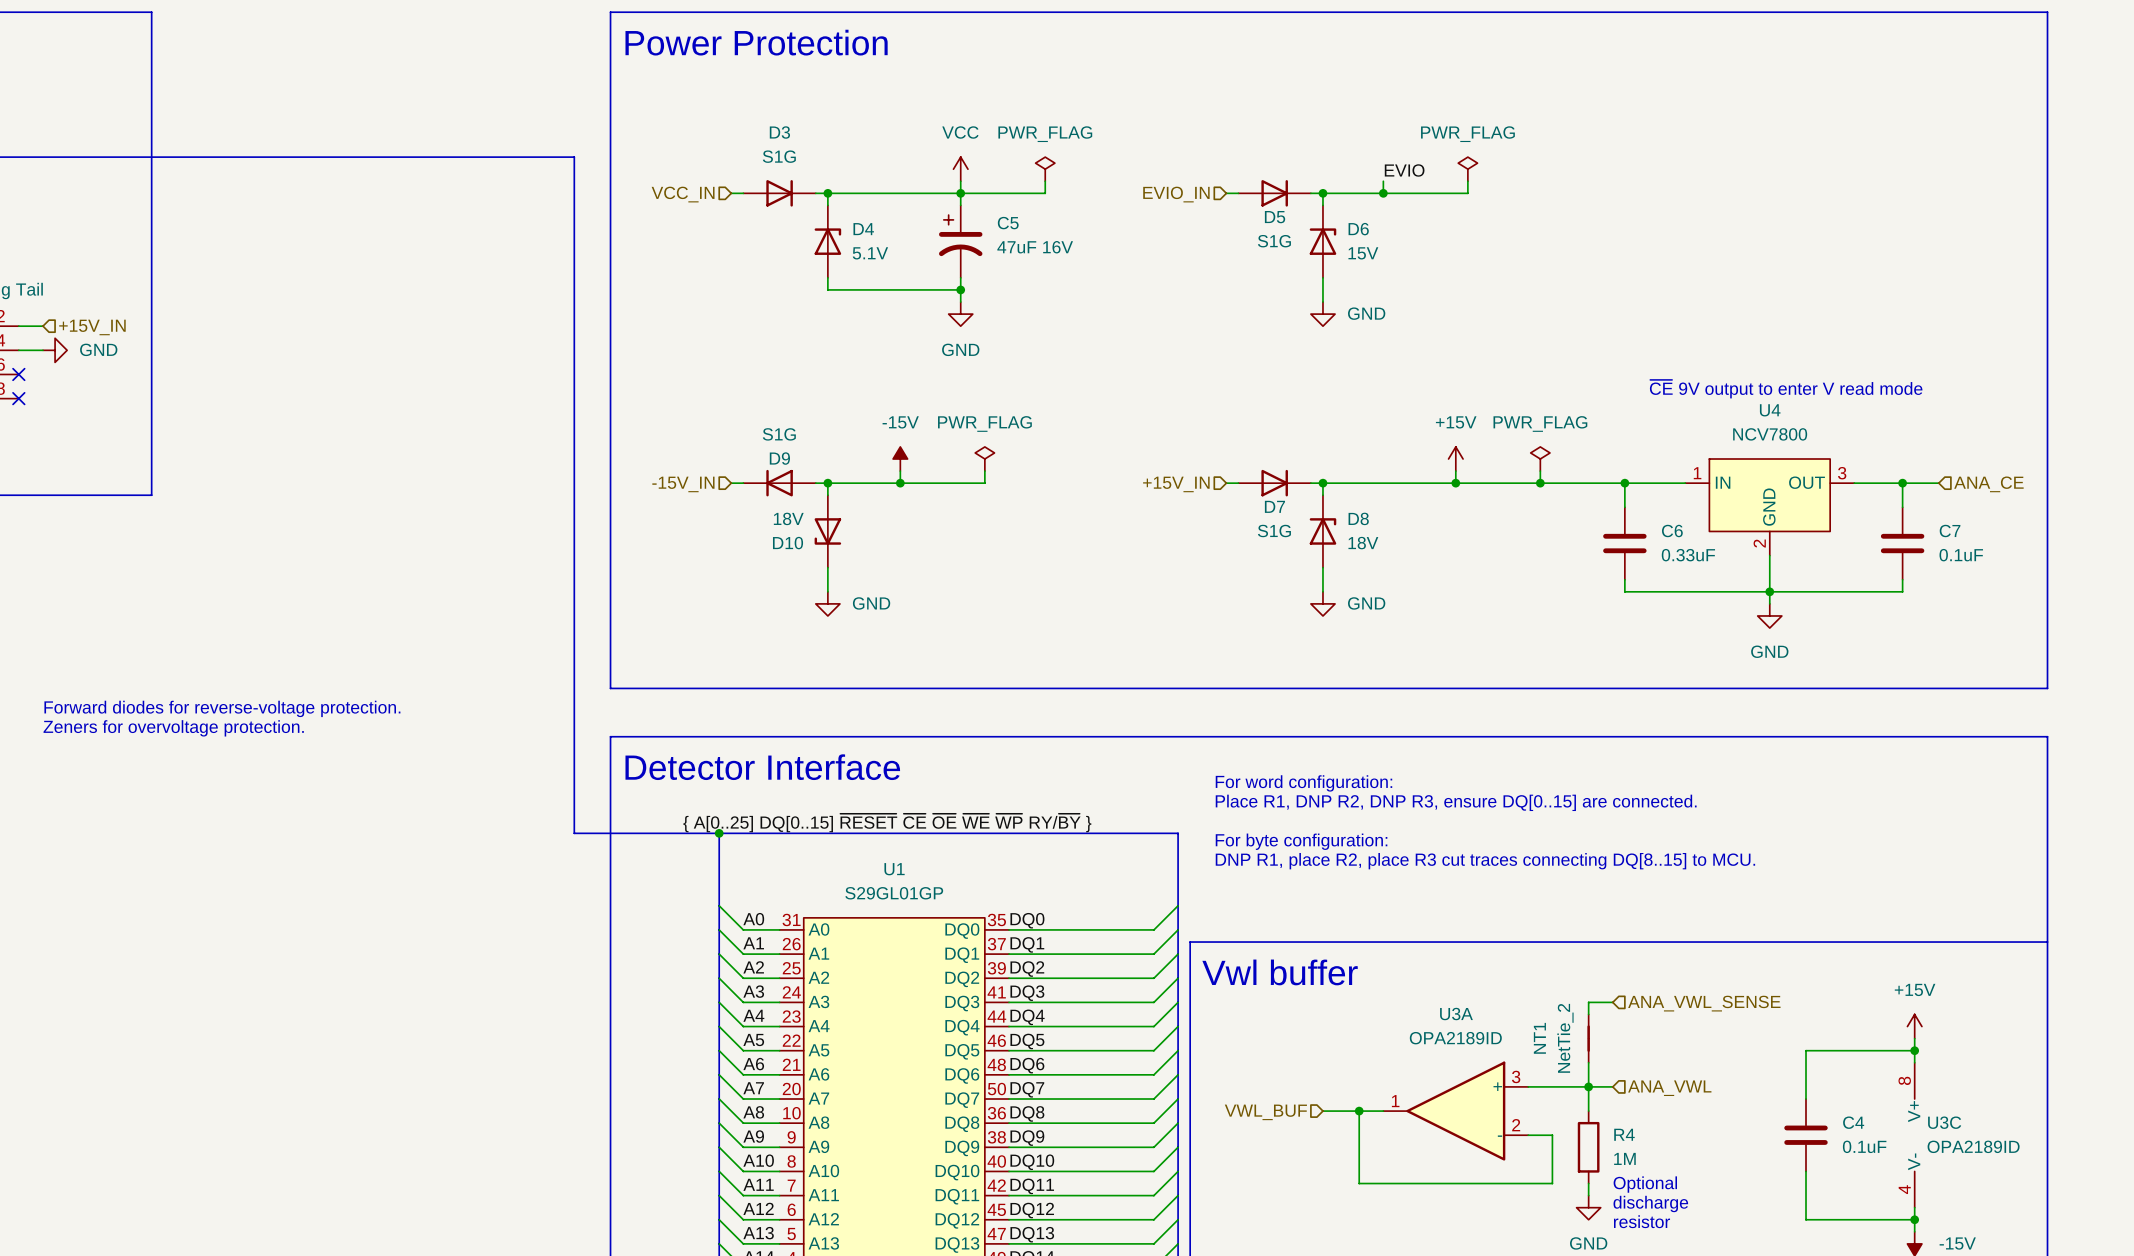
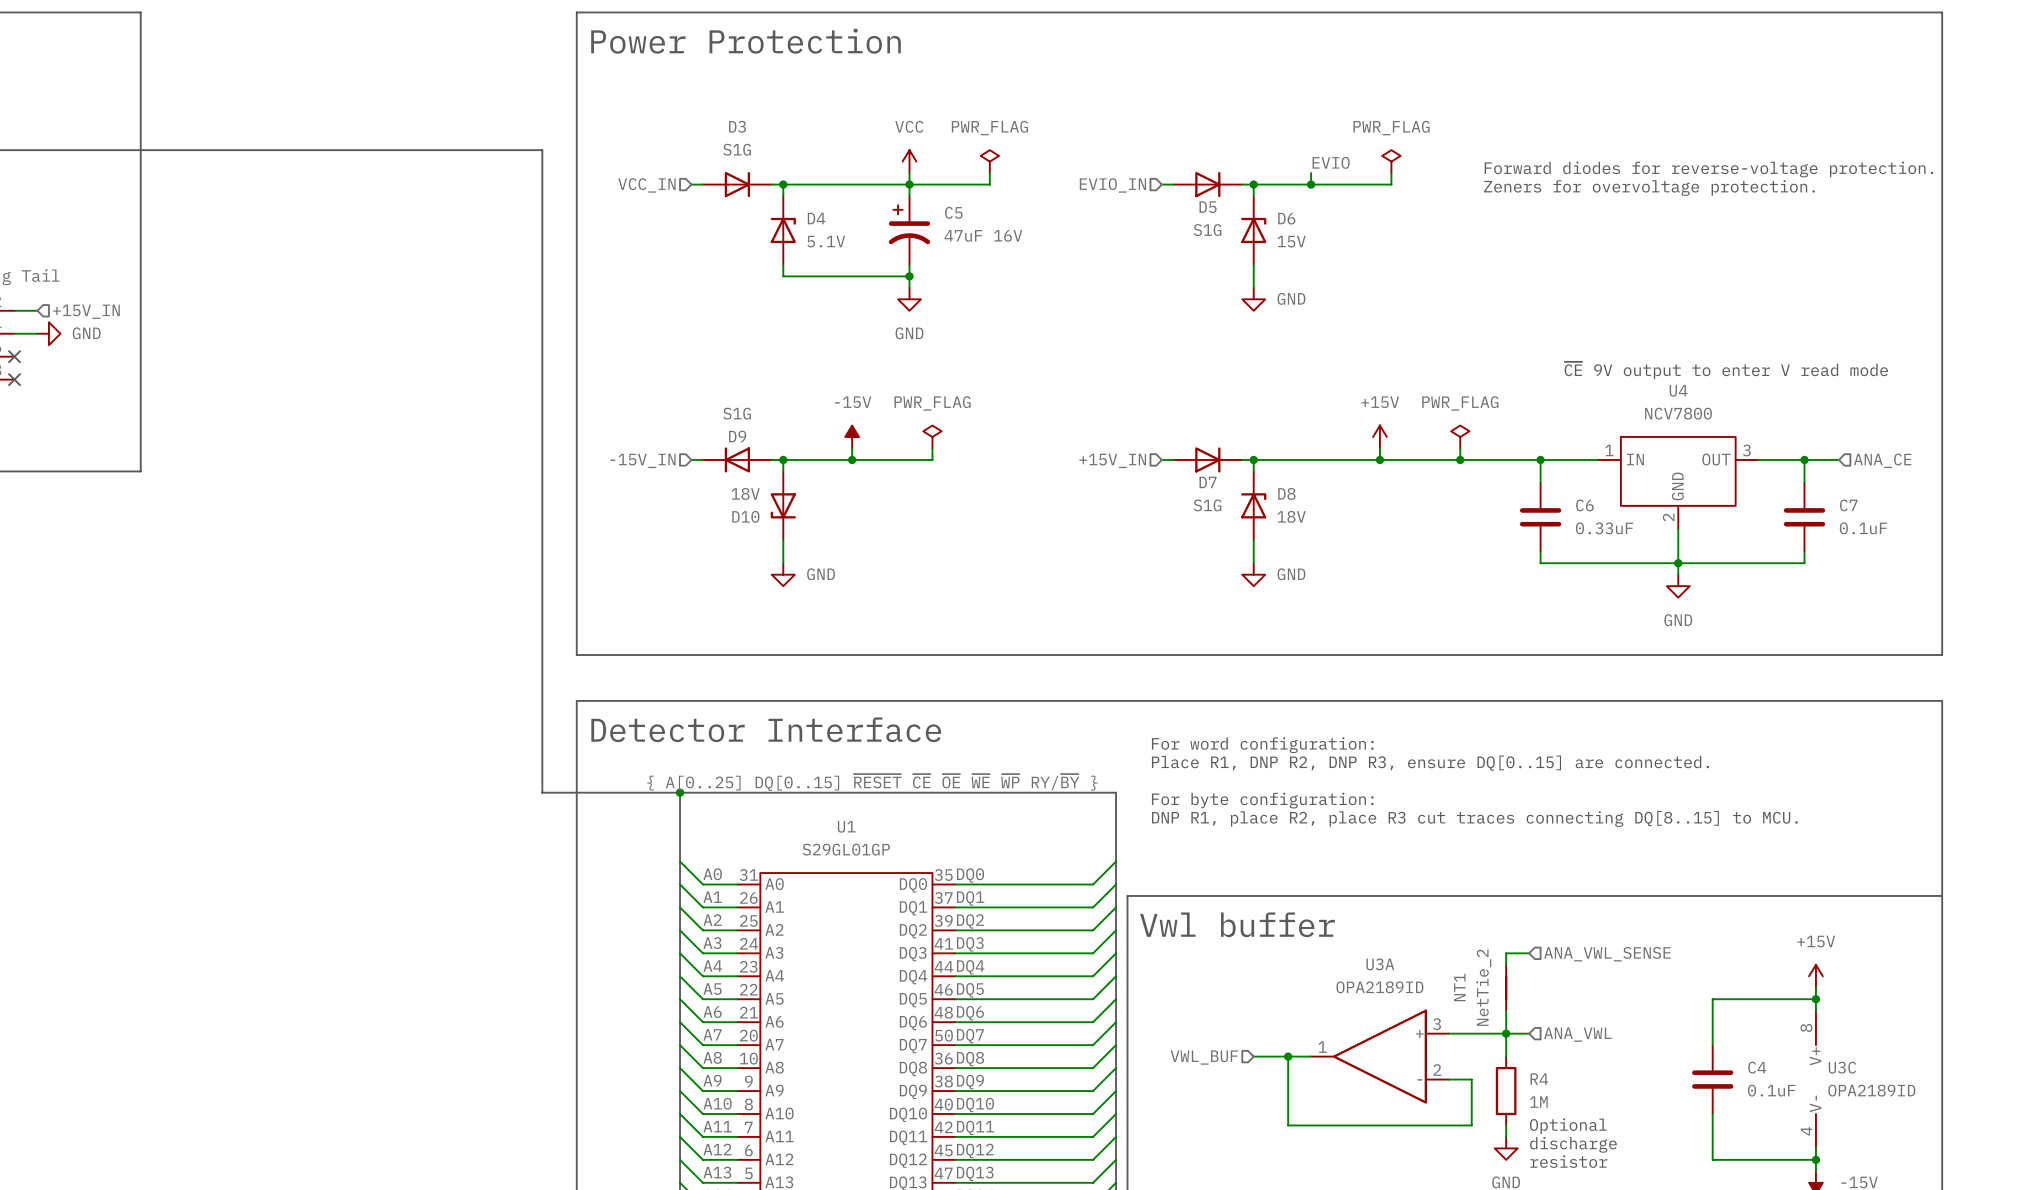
text: none -> Forward diodes for reverse-voltage protection. (1708, 169)
text: none -> Zeners for overvoltage protection. (1649, 187)
text: Forward diodes for reverse-voltage protection. (222, 708) -> none
text: Zeners for overvoltage protection. (173, 728) -> none

